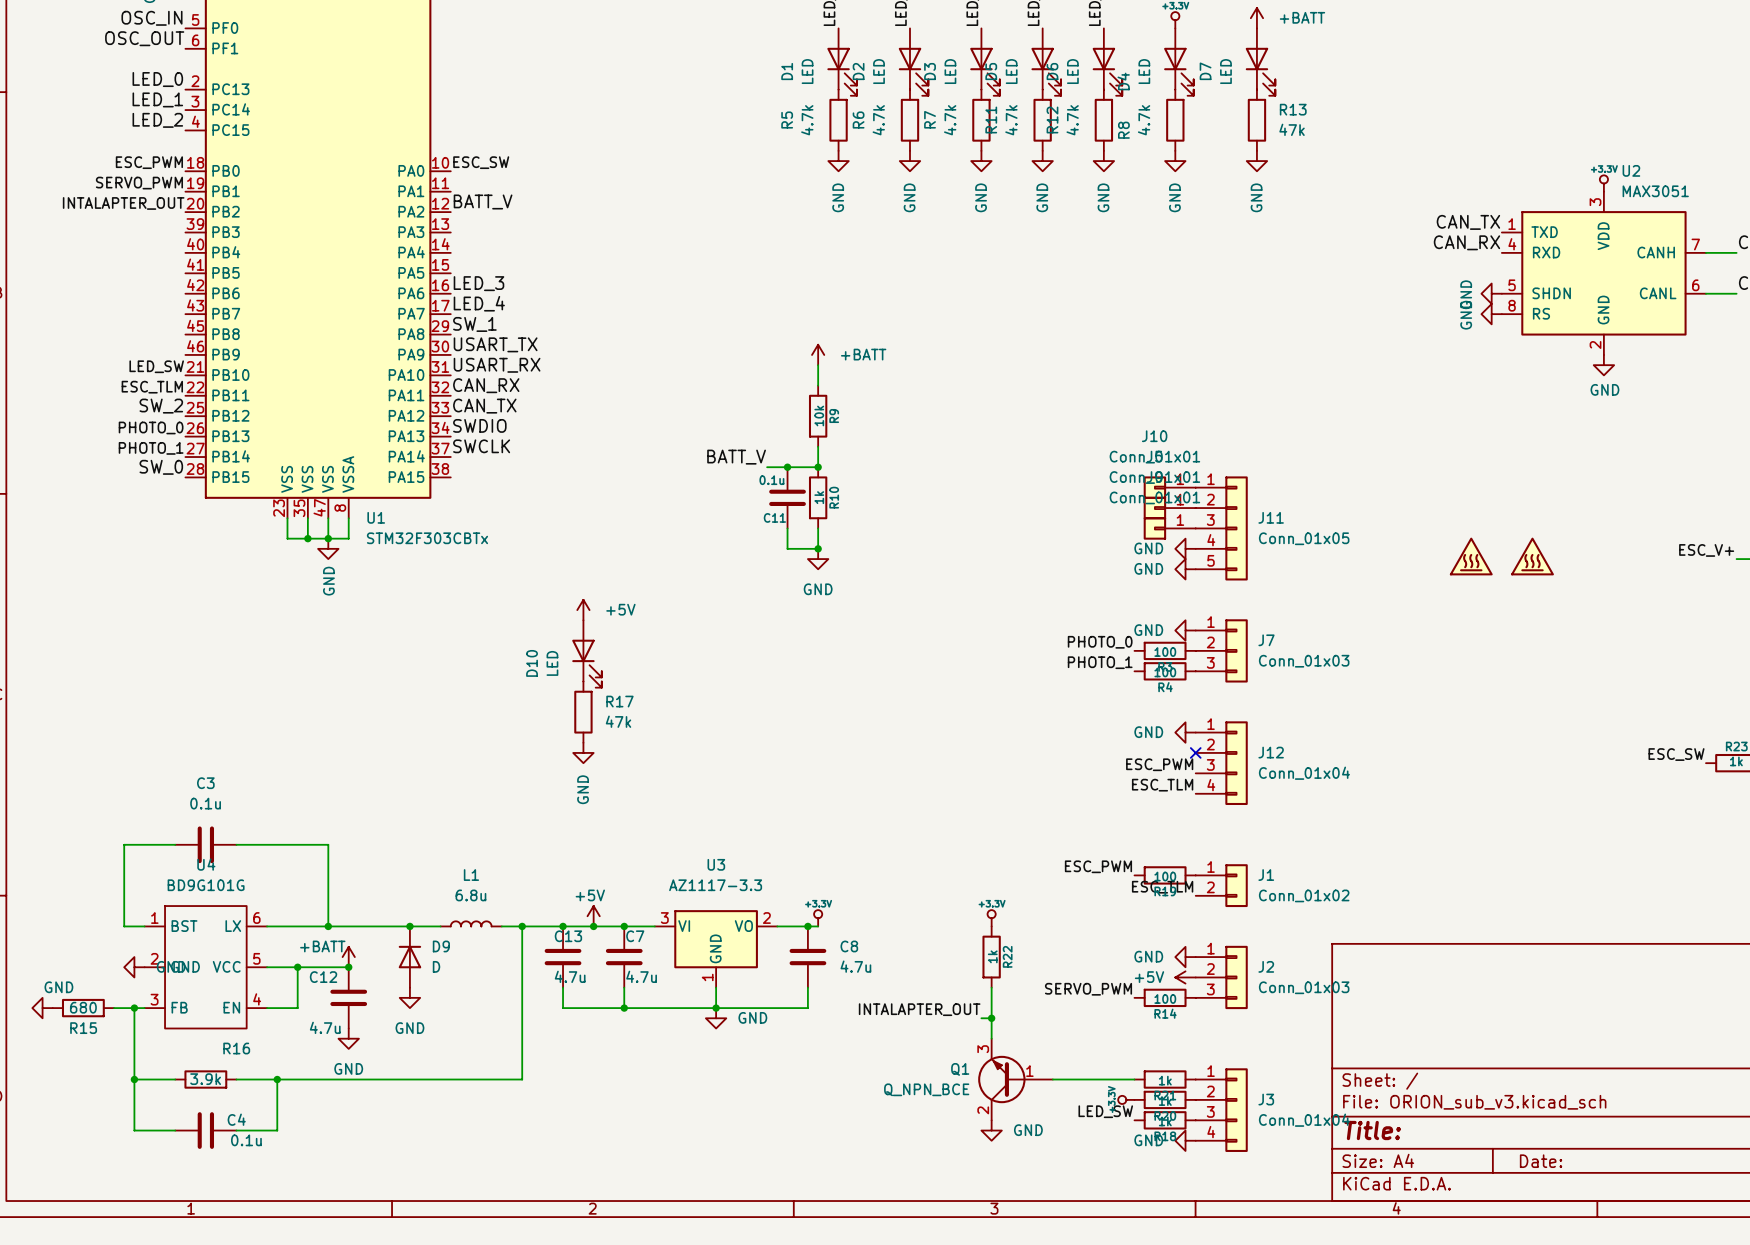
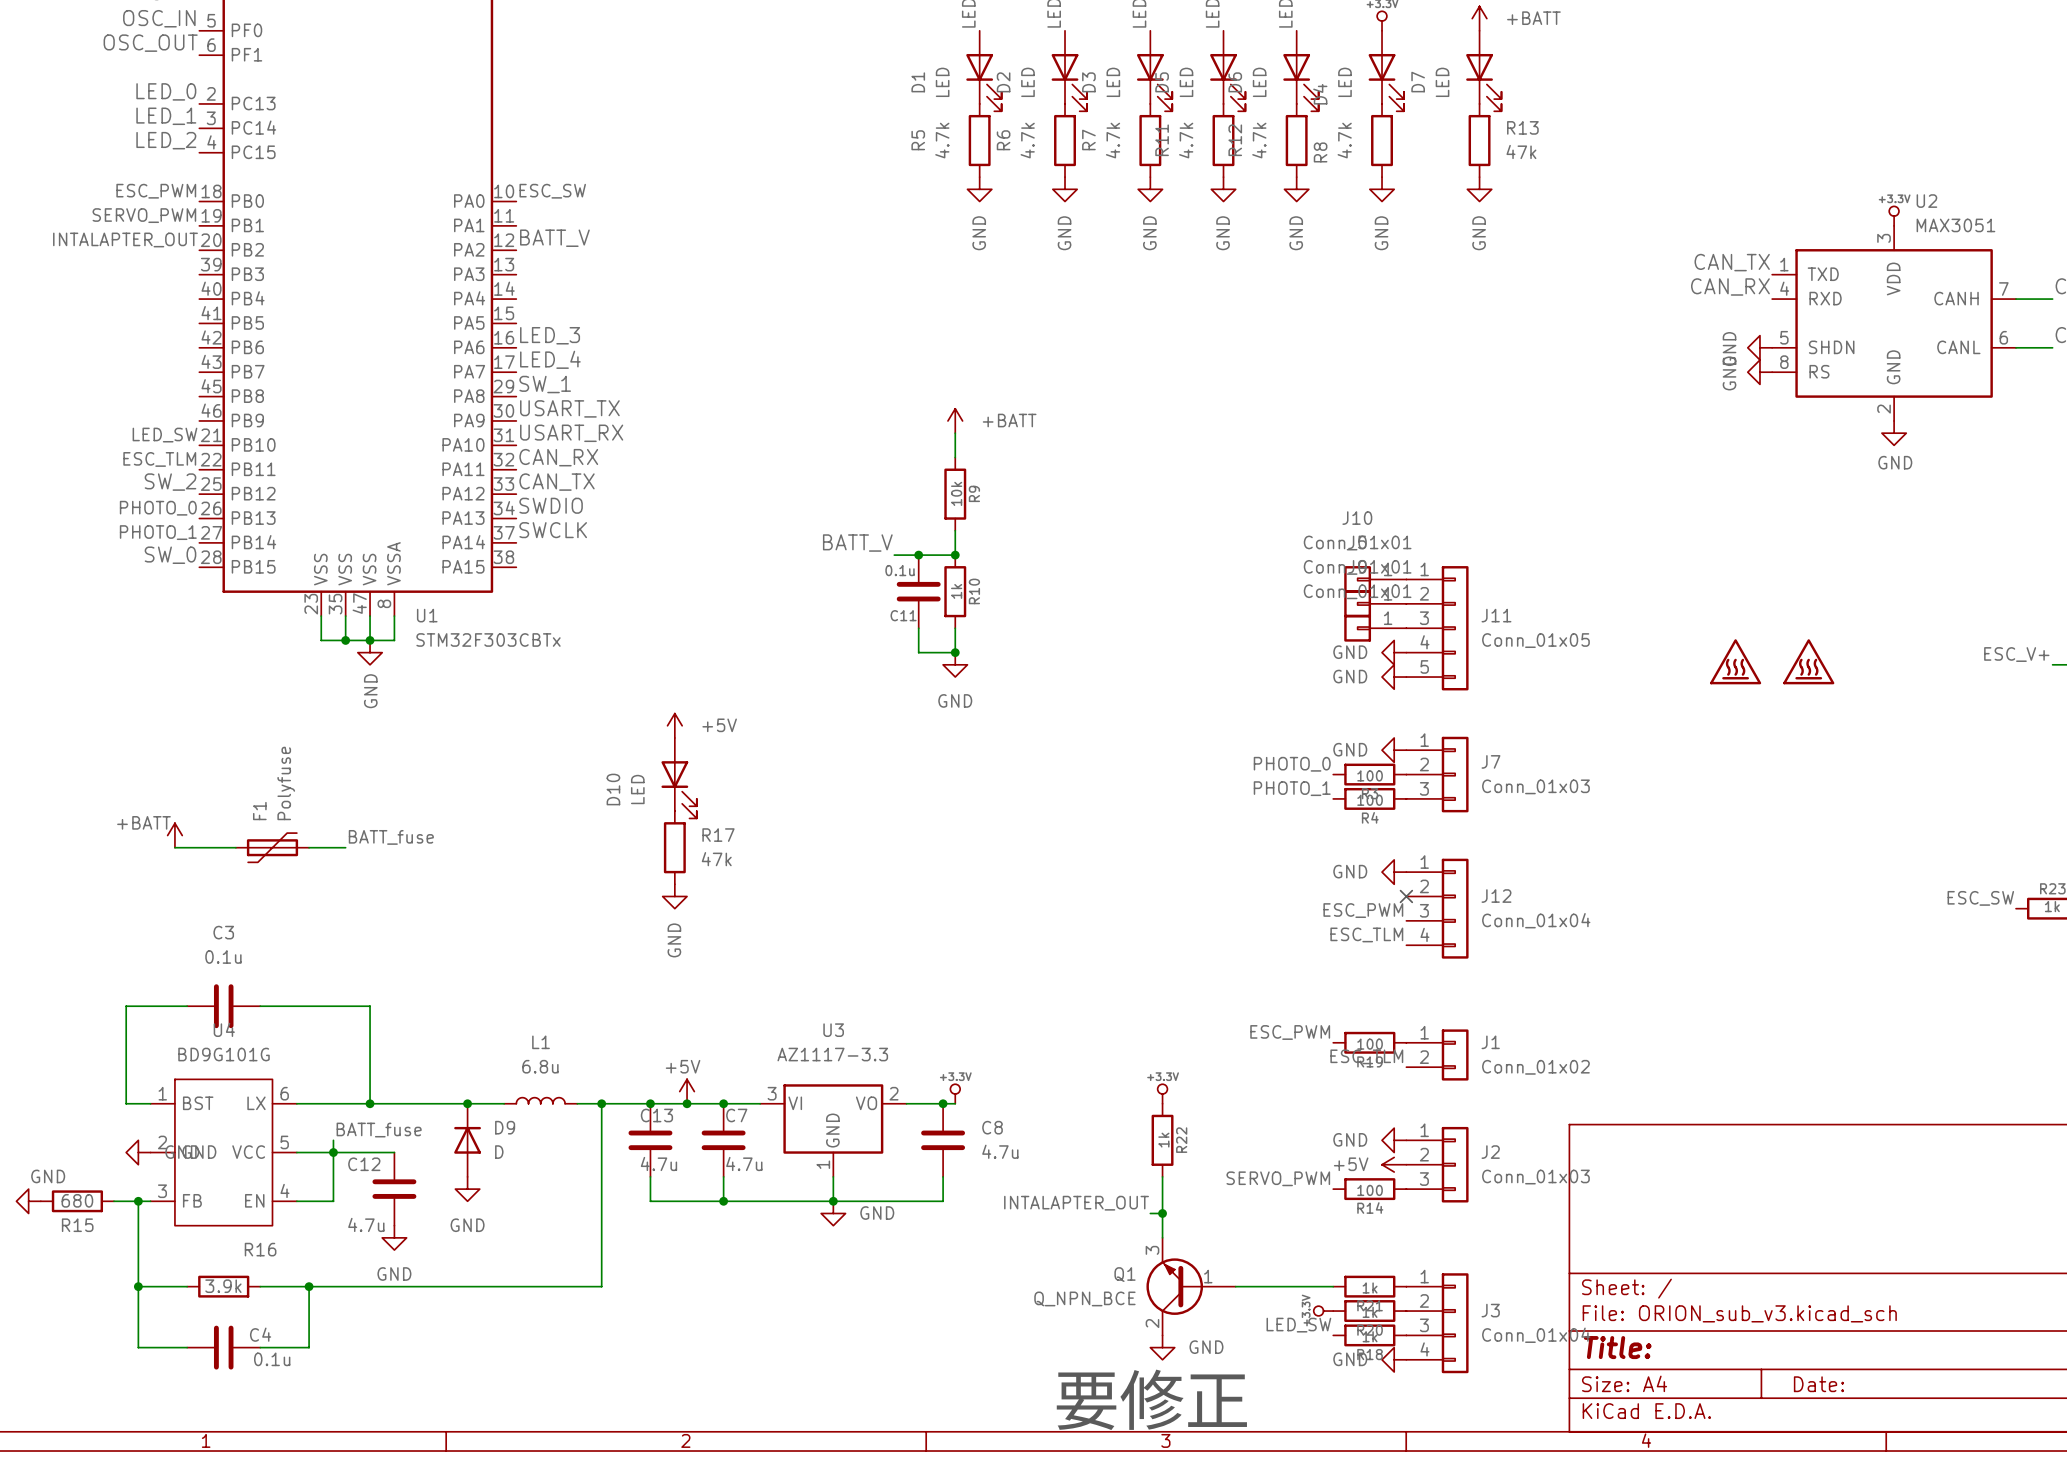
power symbol: none -> +BATT (174, 835)
label: none -> BATT_fuse (391, 837)
wire: none -> (174, 847) (235, 847)
F1: none -> Polyfuse (272, 847)
wire: none -> (309, 847) (345, 847)
label: none -> BATT_fuse (379, 1130)
wire: none -> (333, 1140) (333, 1152)
power symbol: +BATT (348, 957) -> none
junction: (348, 967) -> none
text: none -> 要修正 (1151, 1399)

